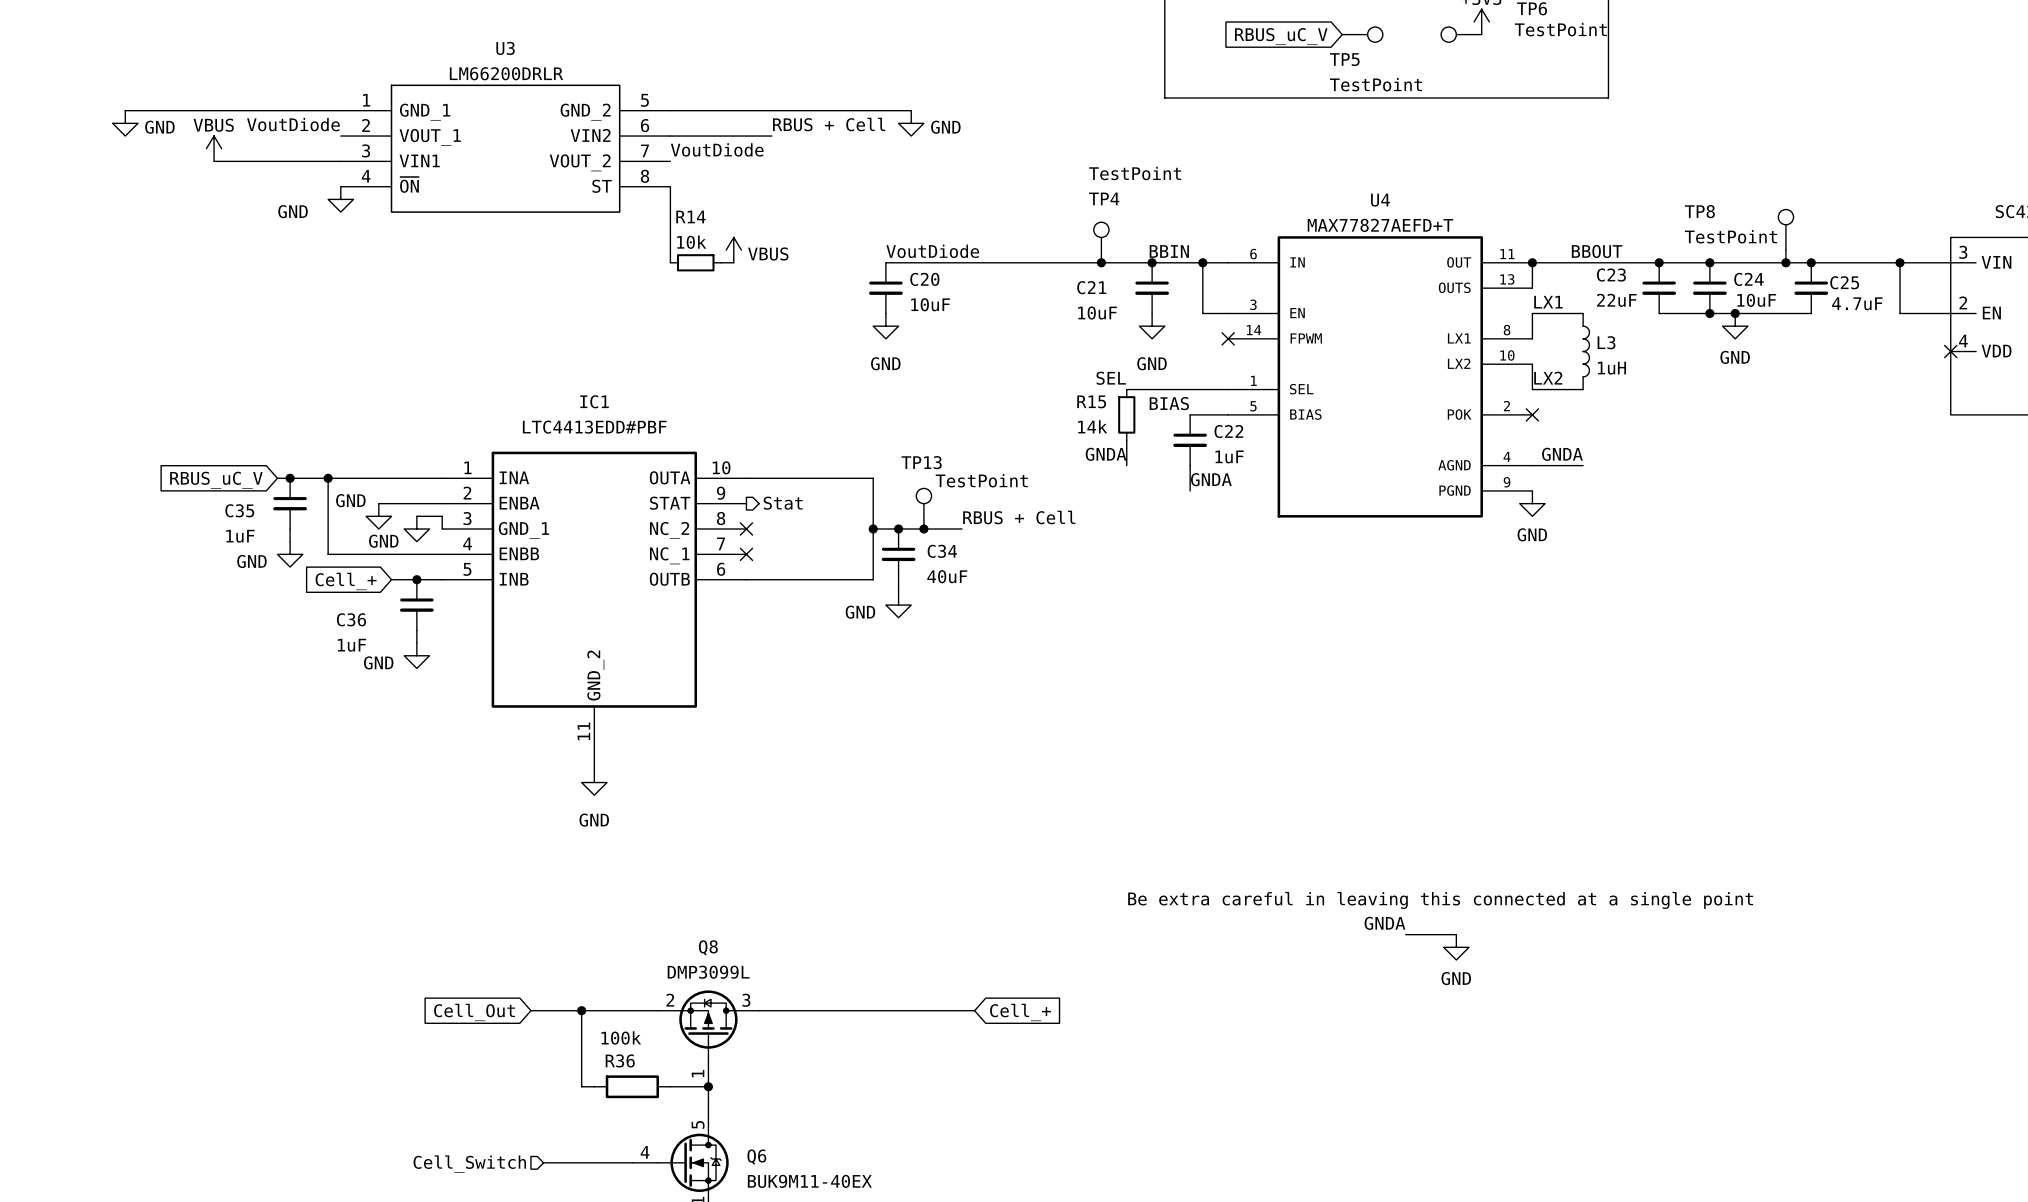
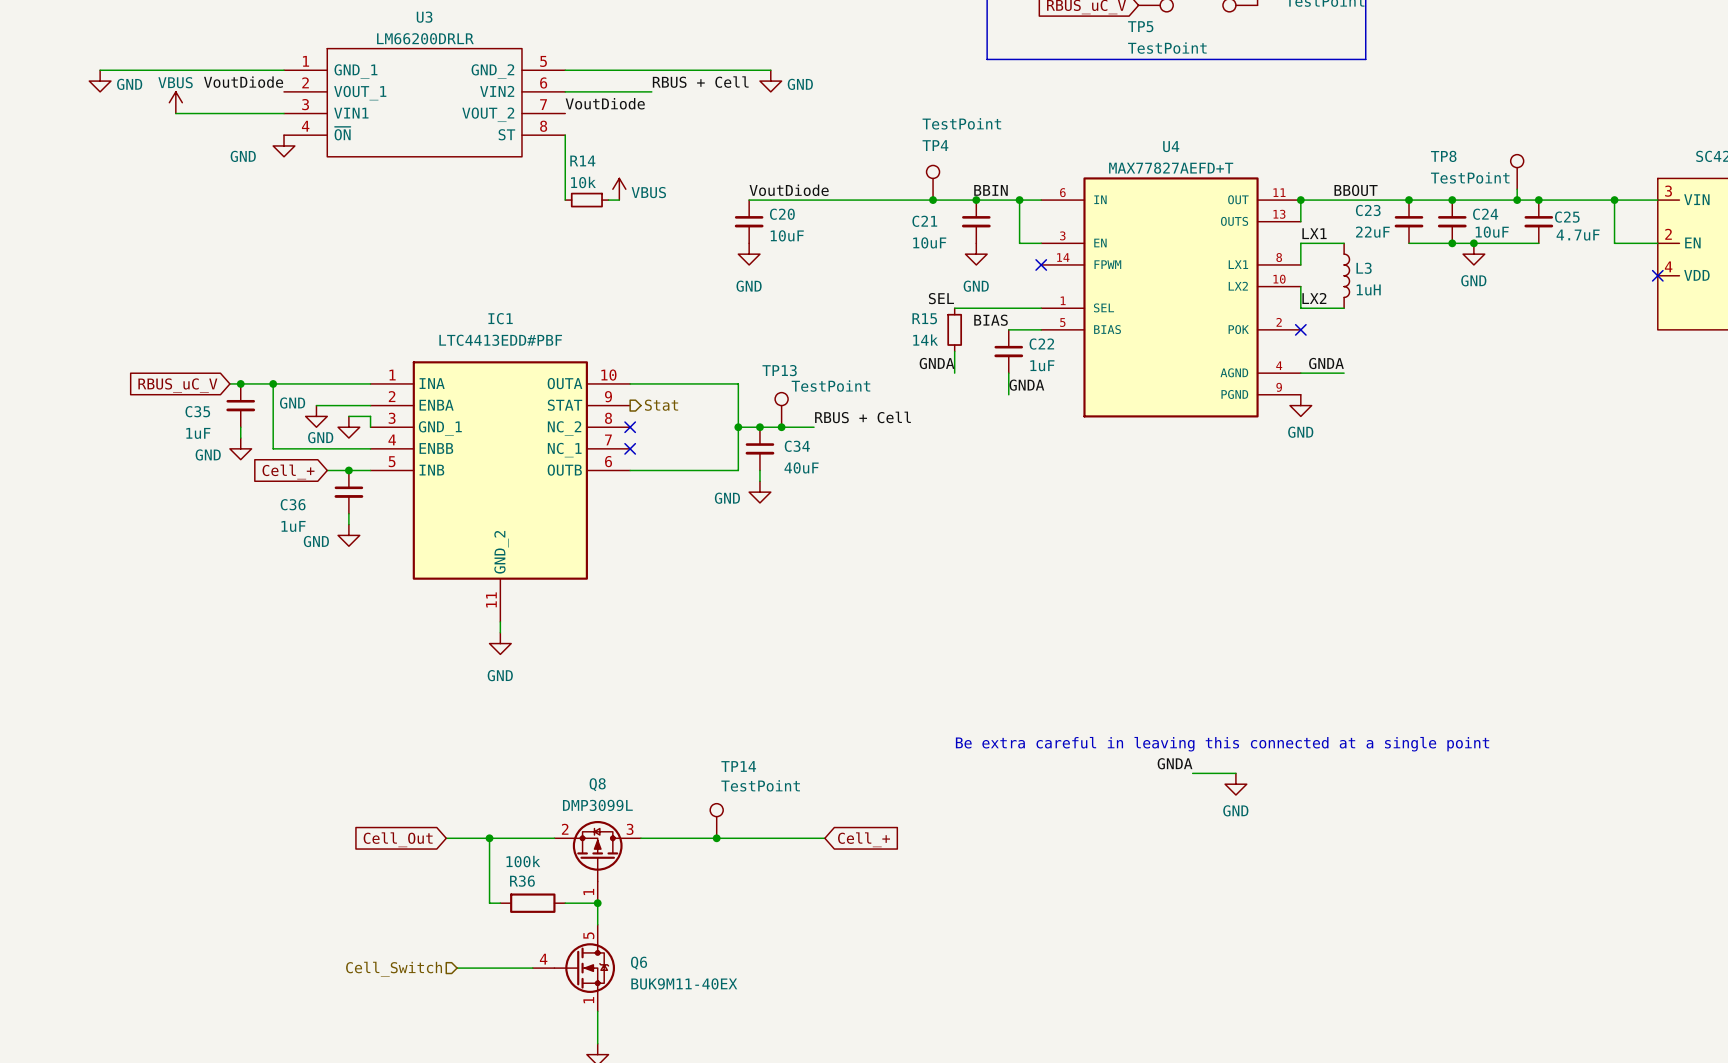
TP14: none -> TestPoint (716, 820)
junction: none -> (716, 838)

